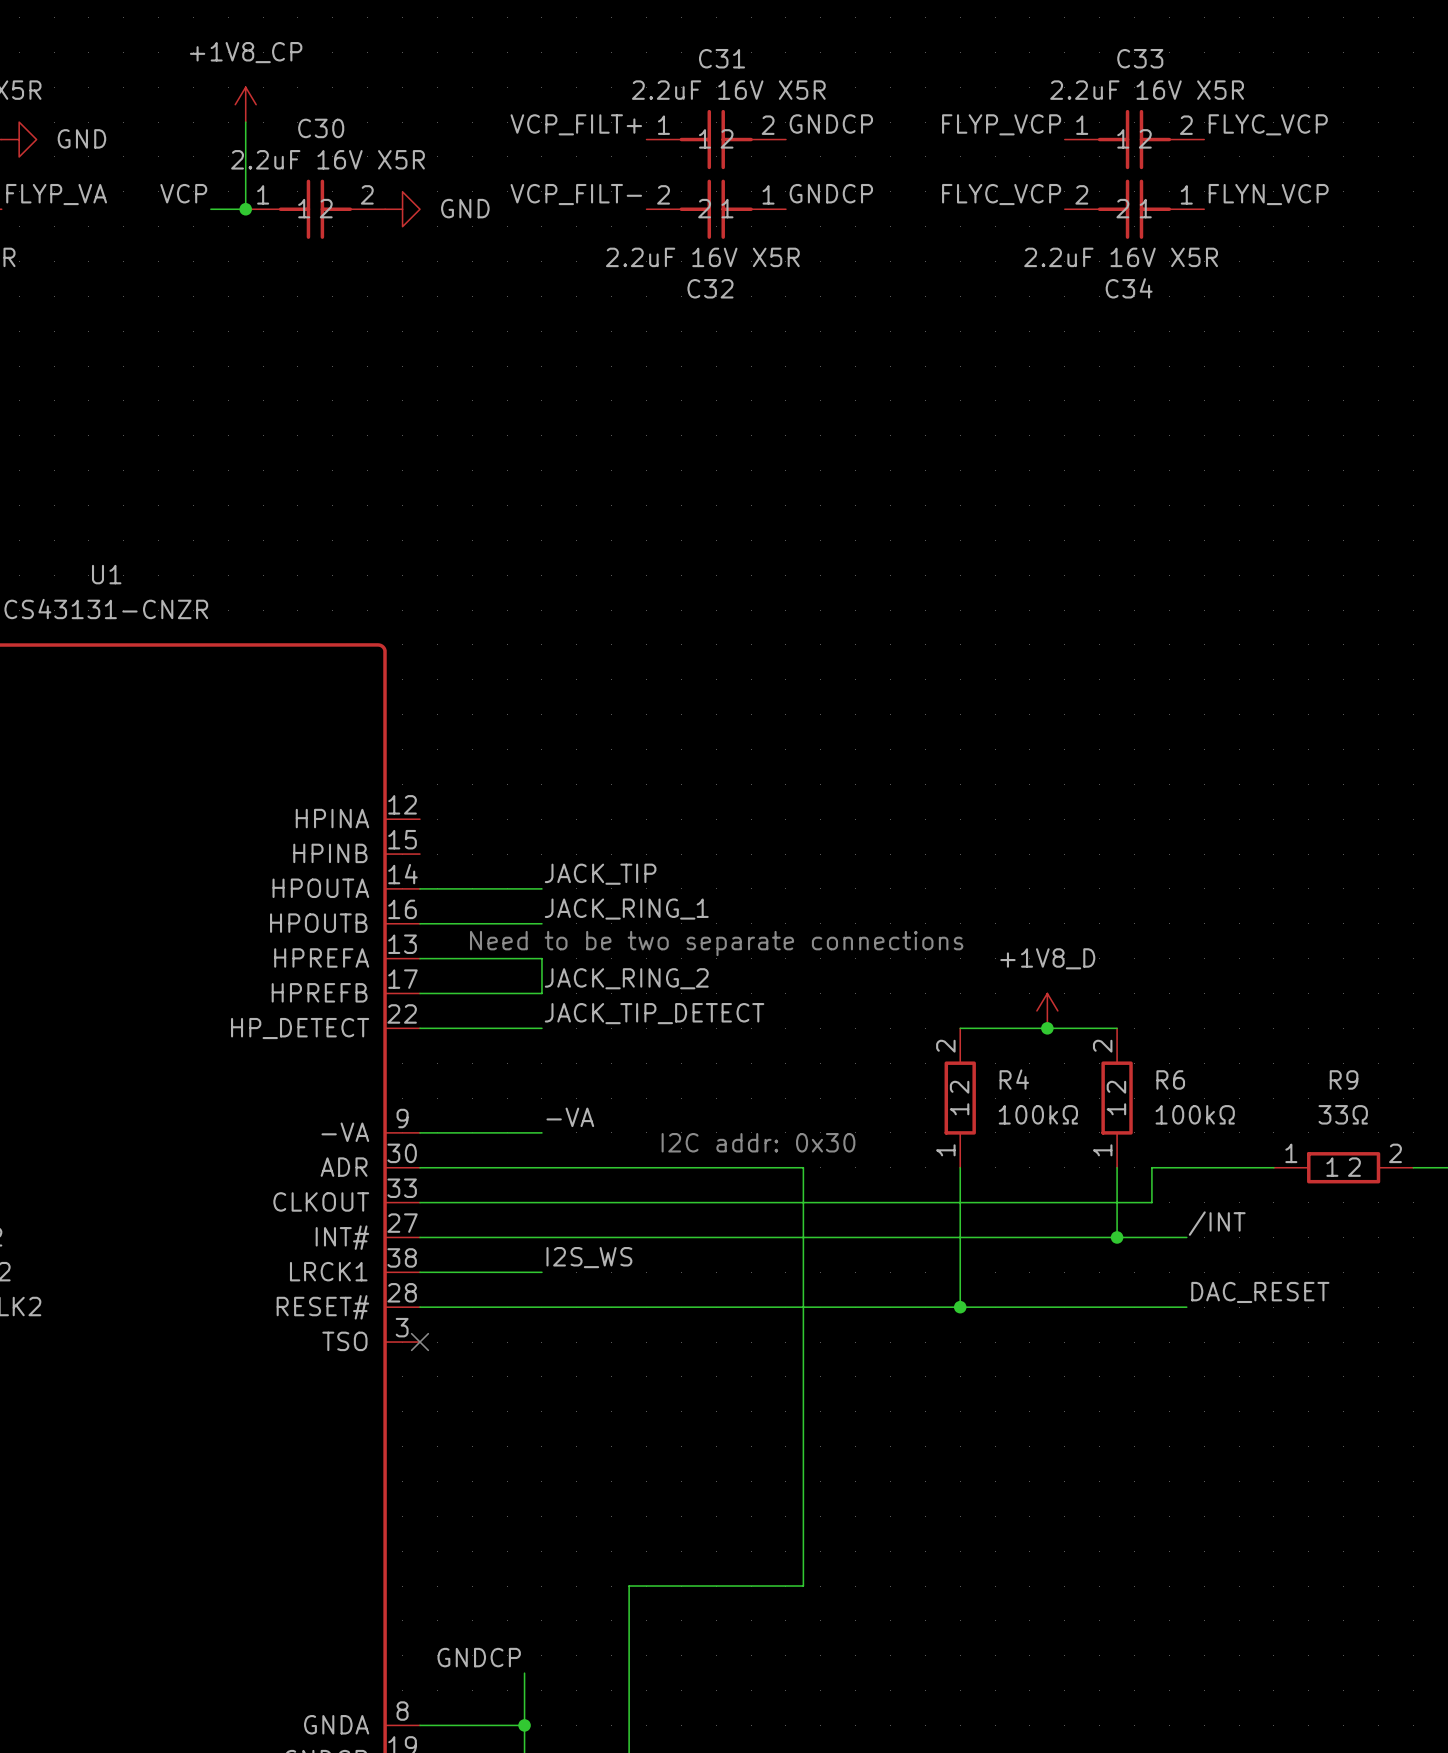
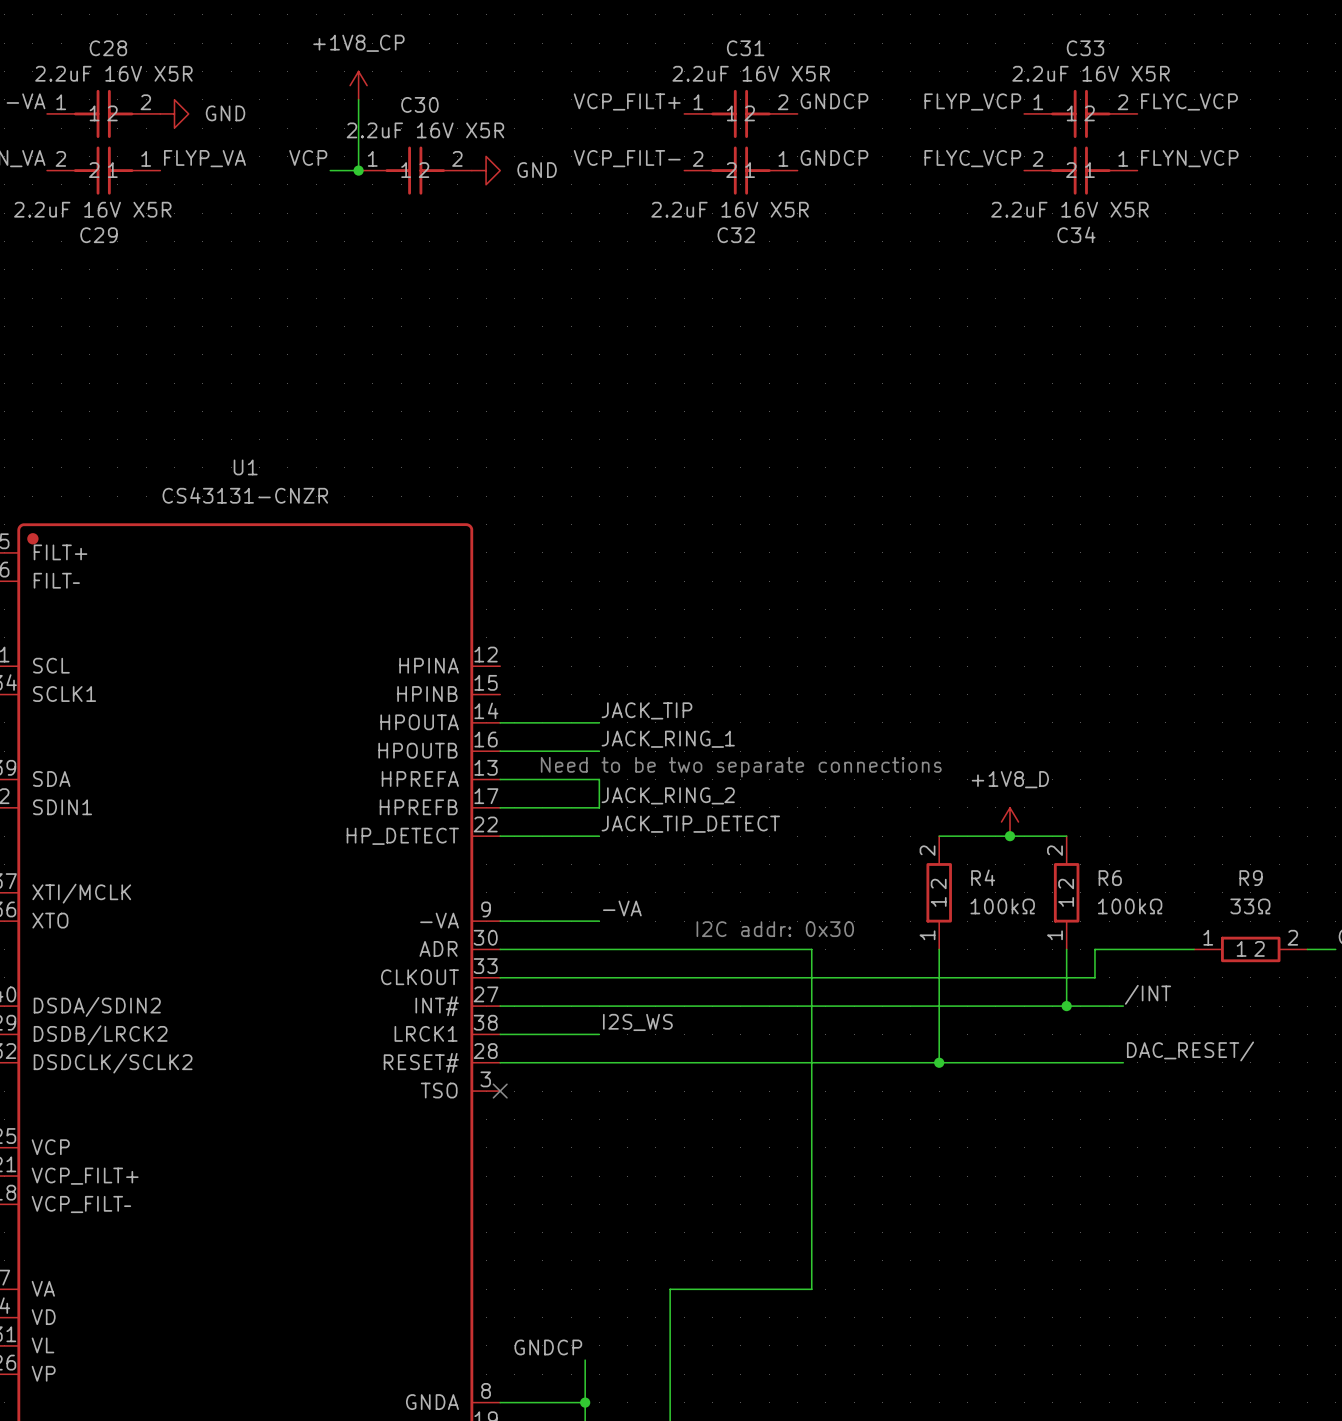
label: DAC_RESET (1260, 1292) -> DAC_RESET/ (1190, 1051)

